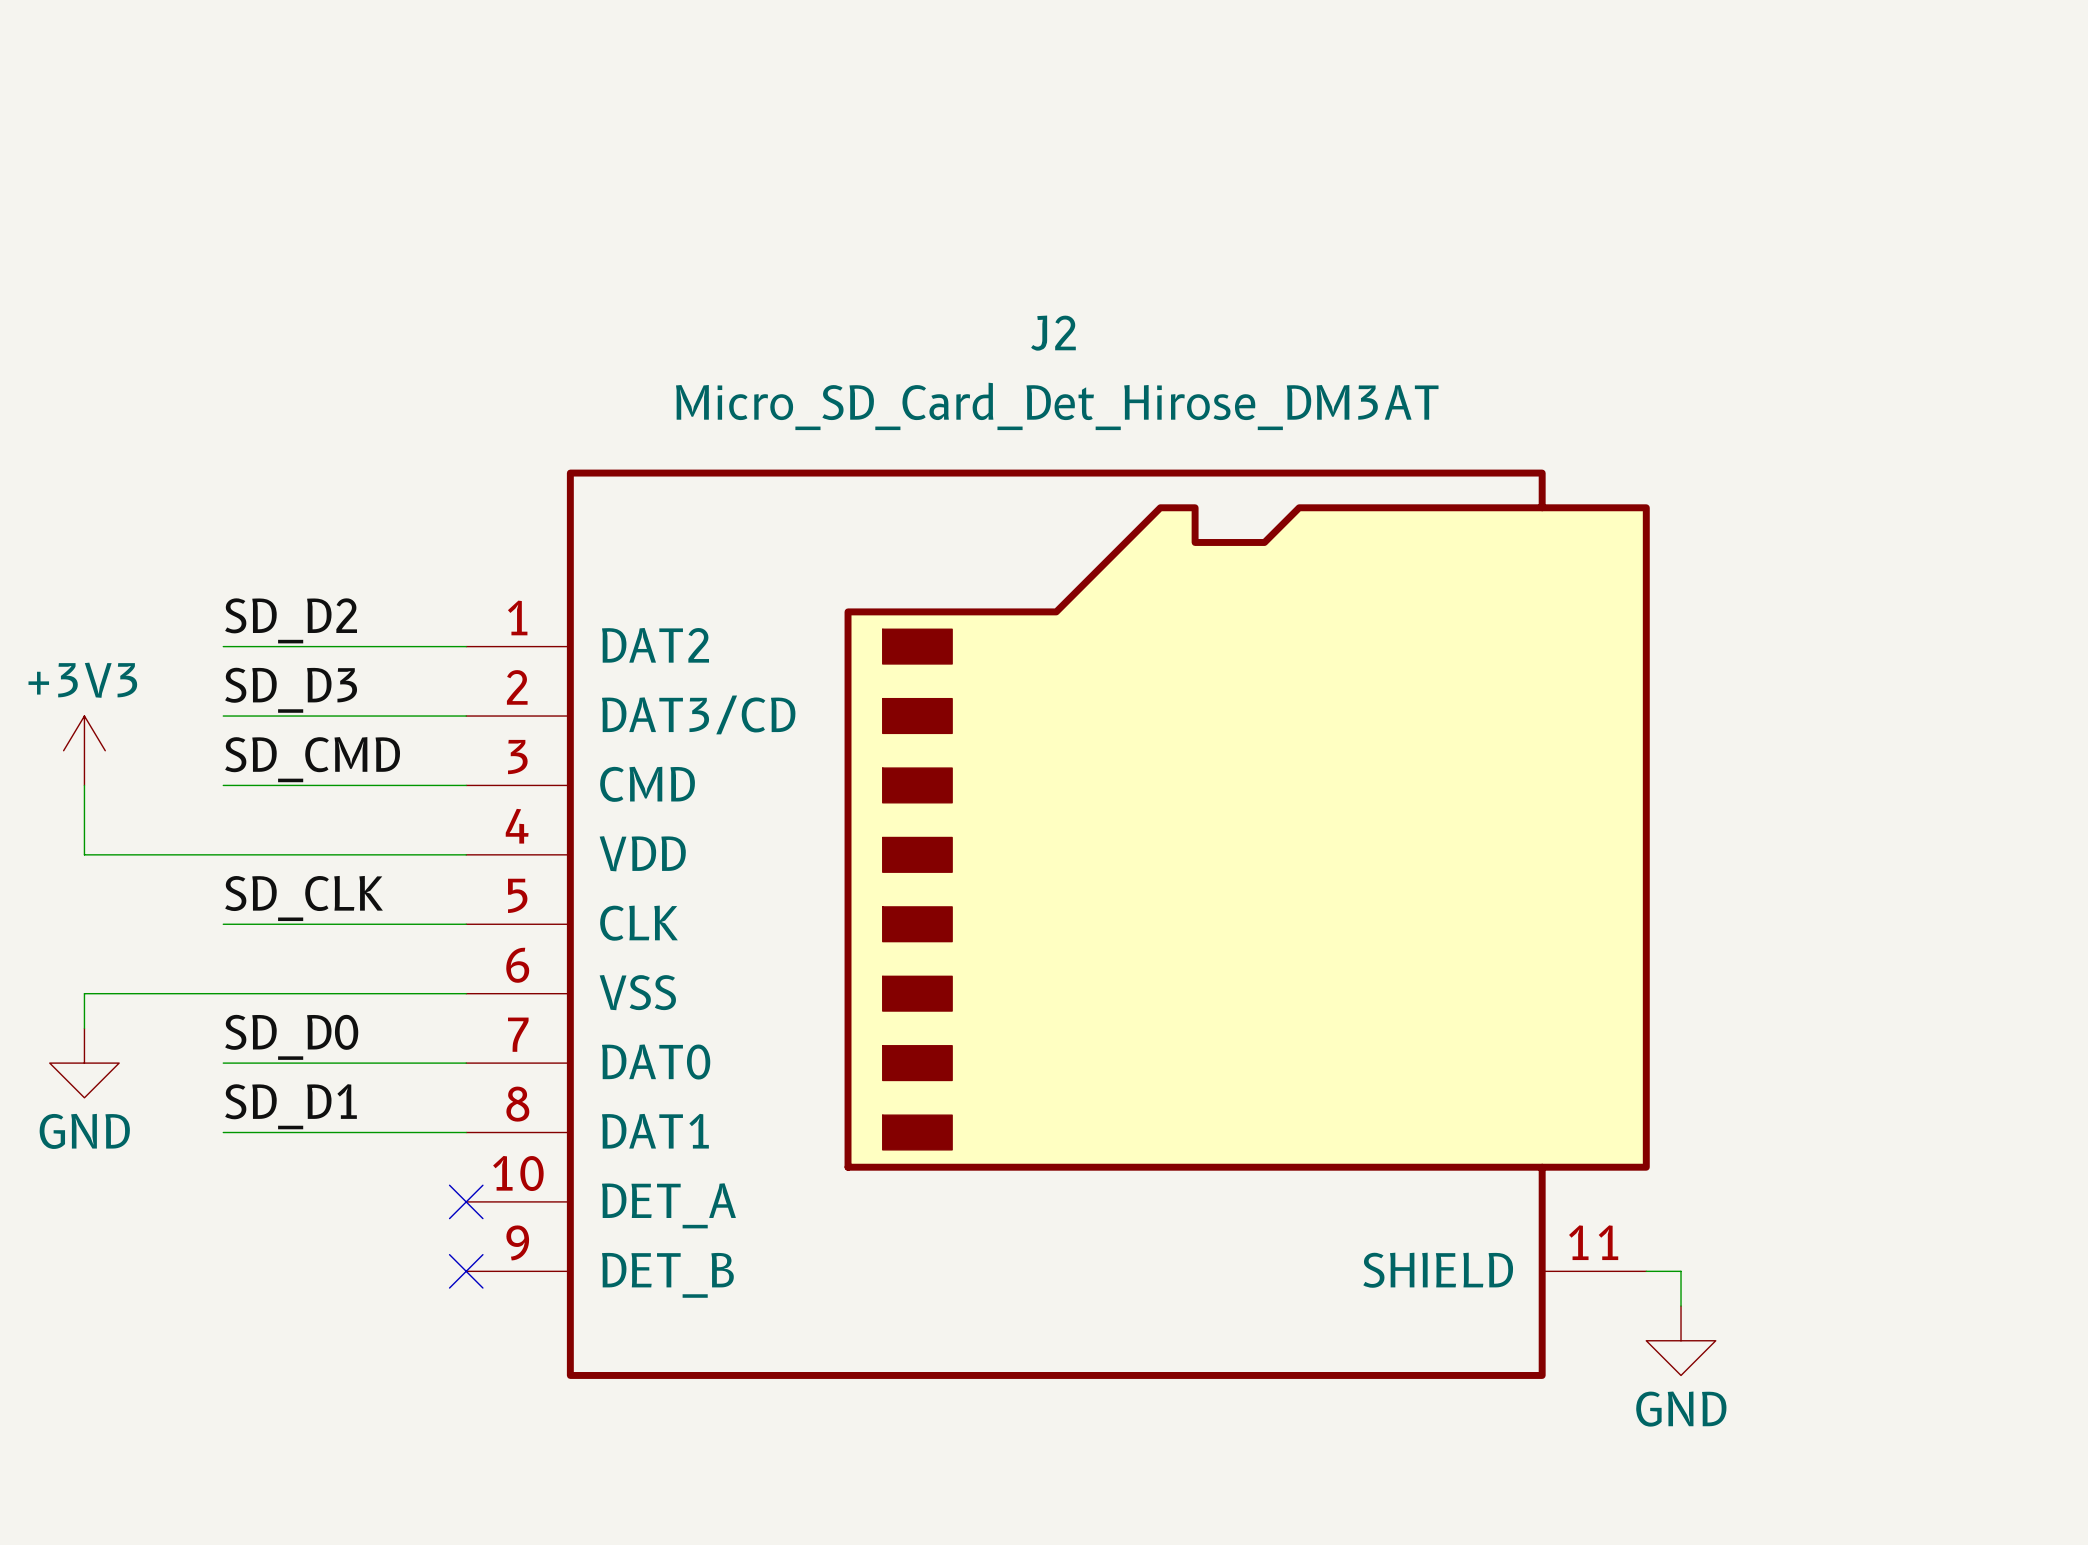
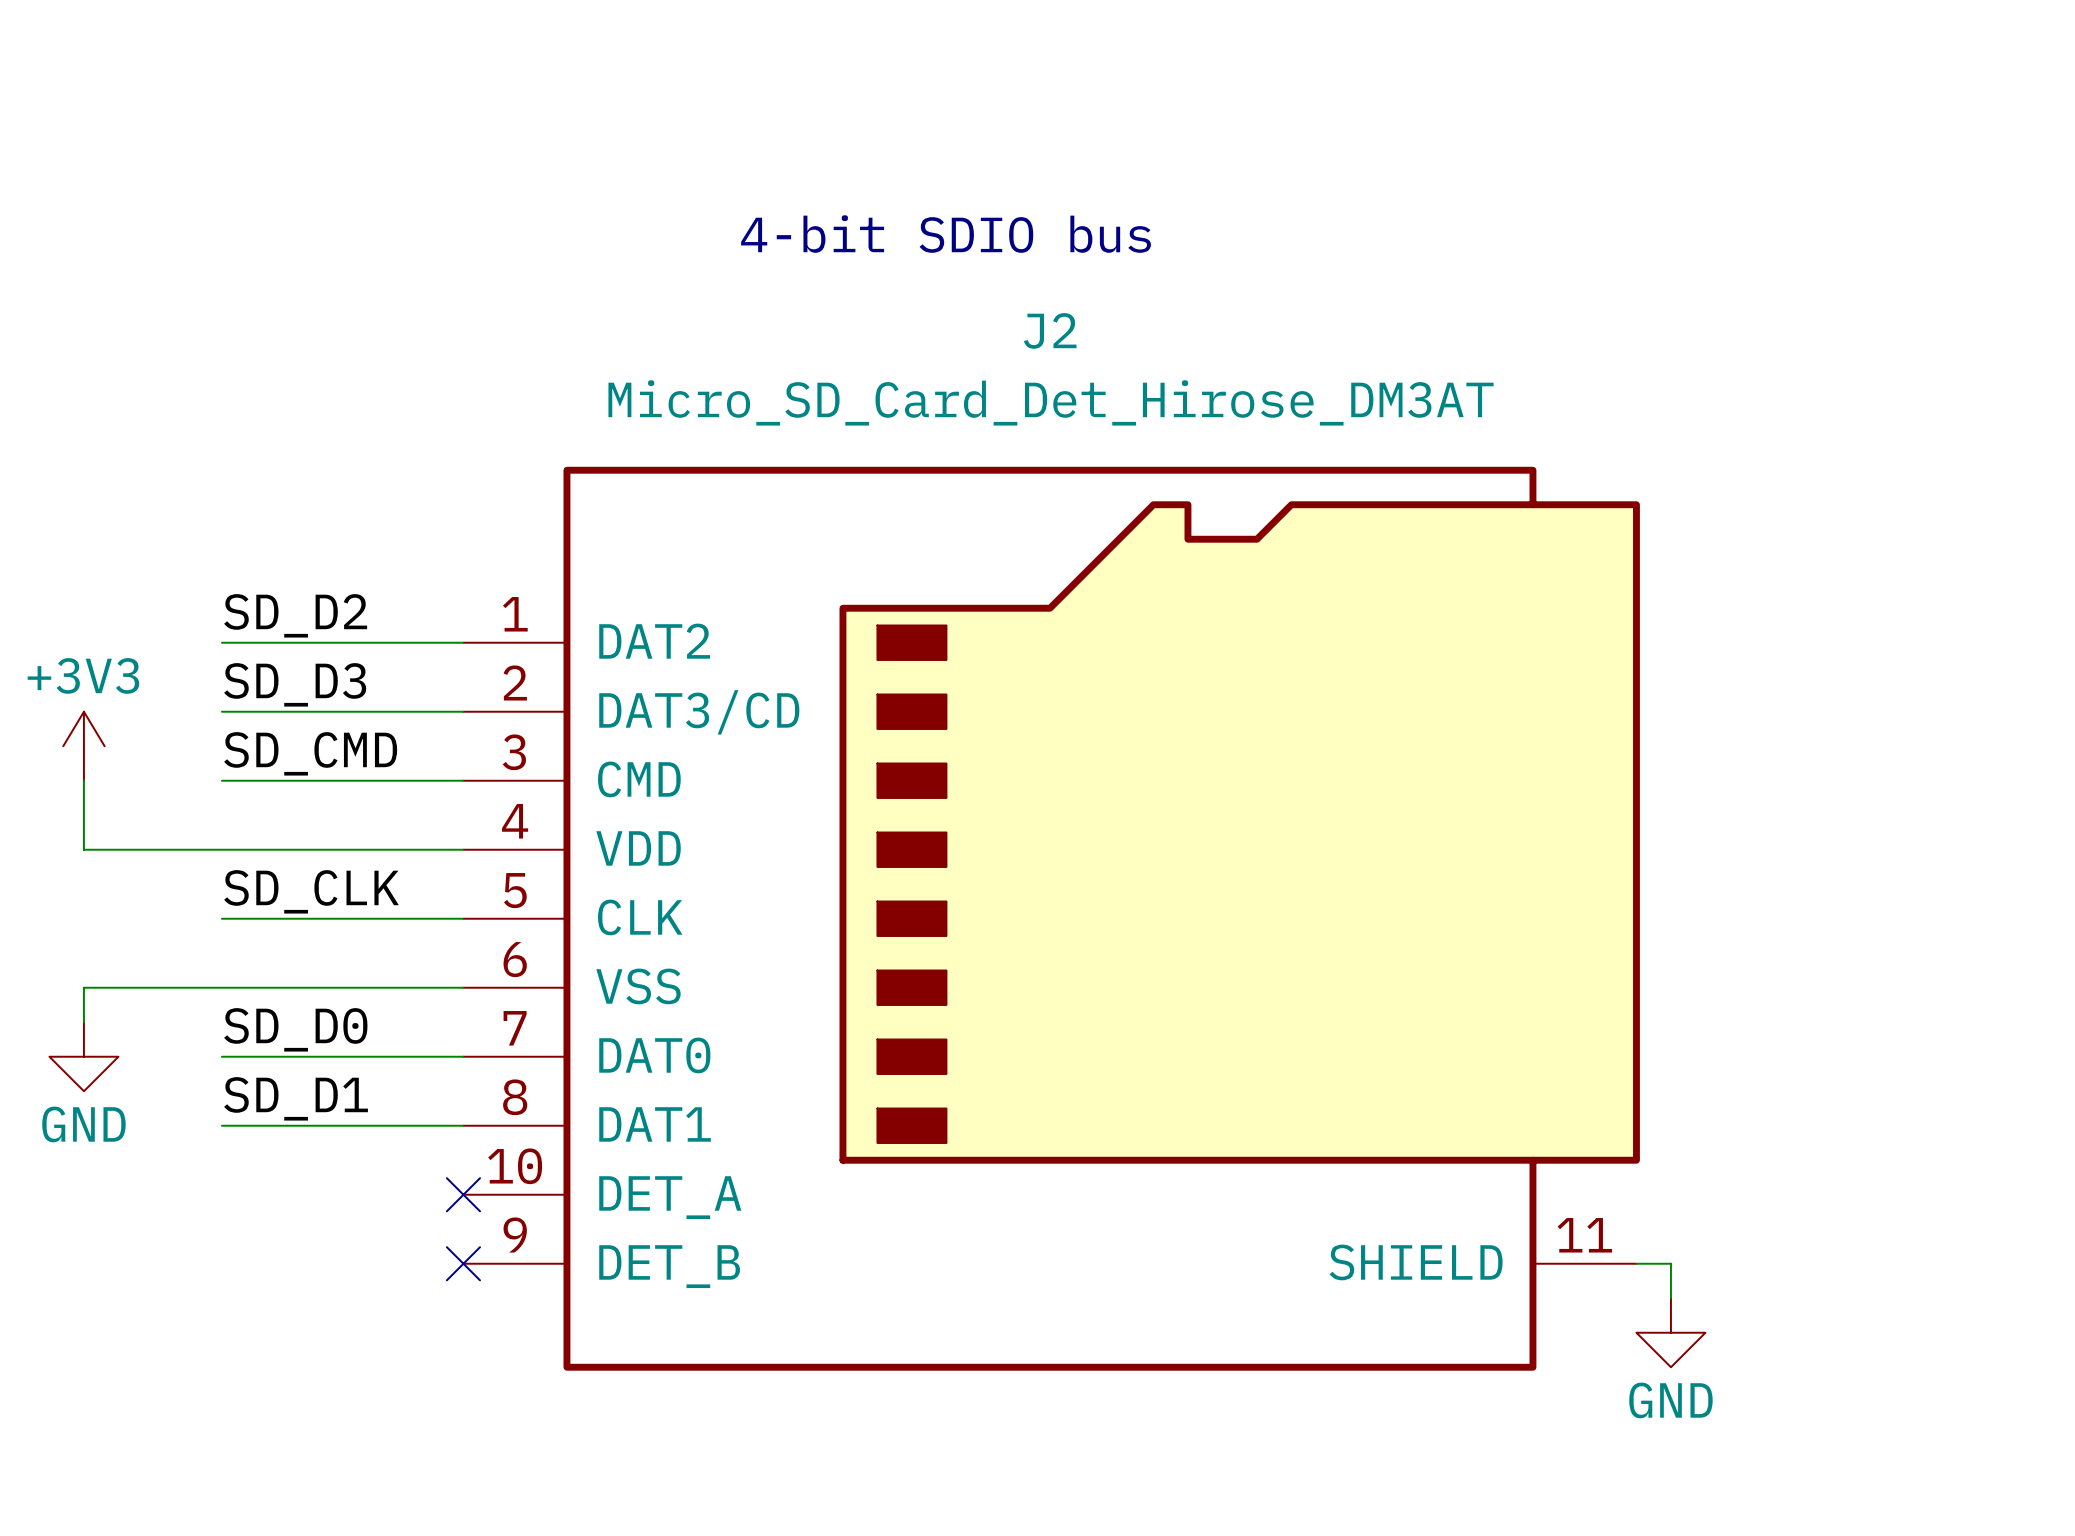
text: none -> 4-bit SDIO bus (946, 234)

